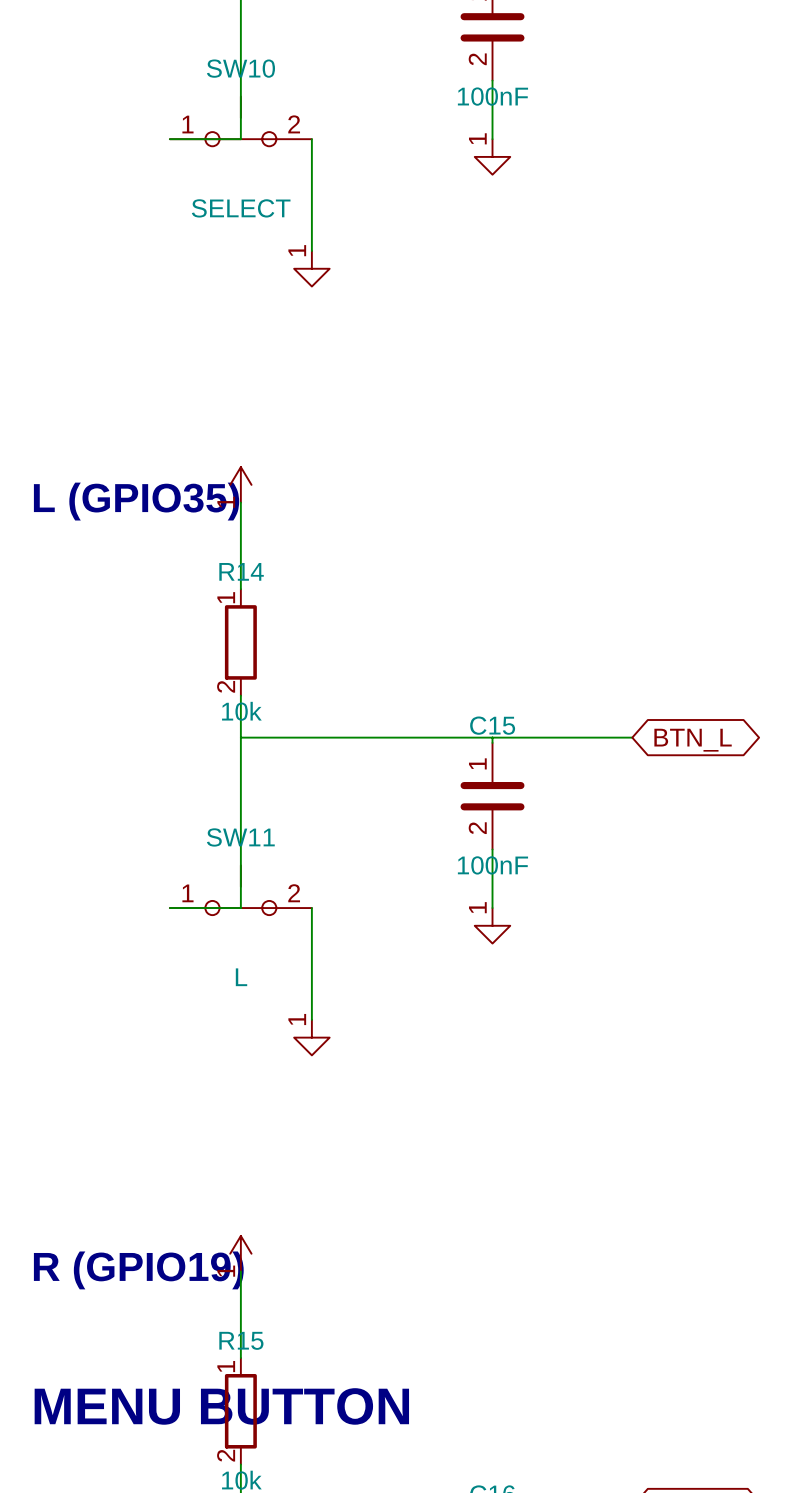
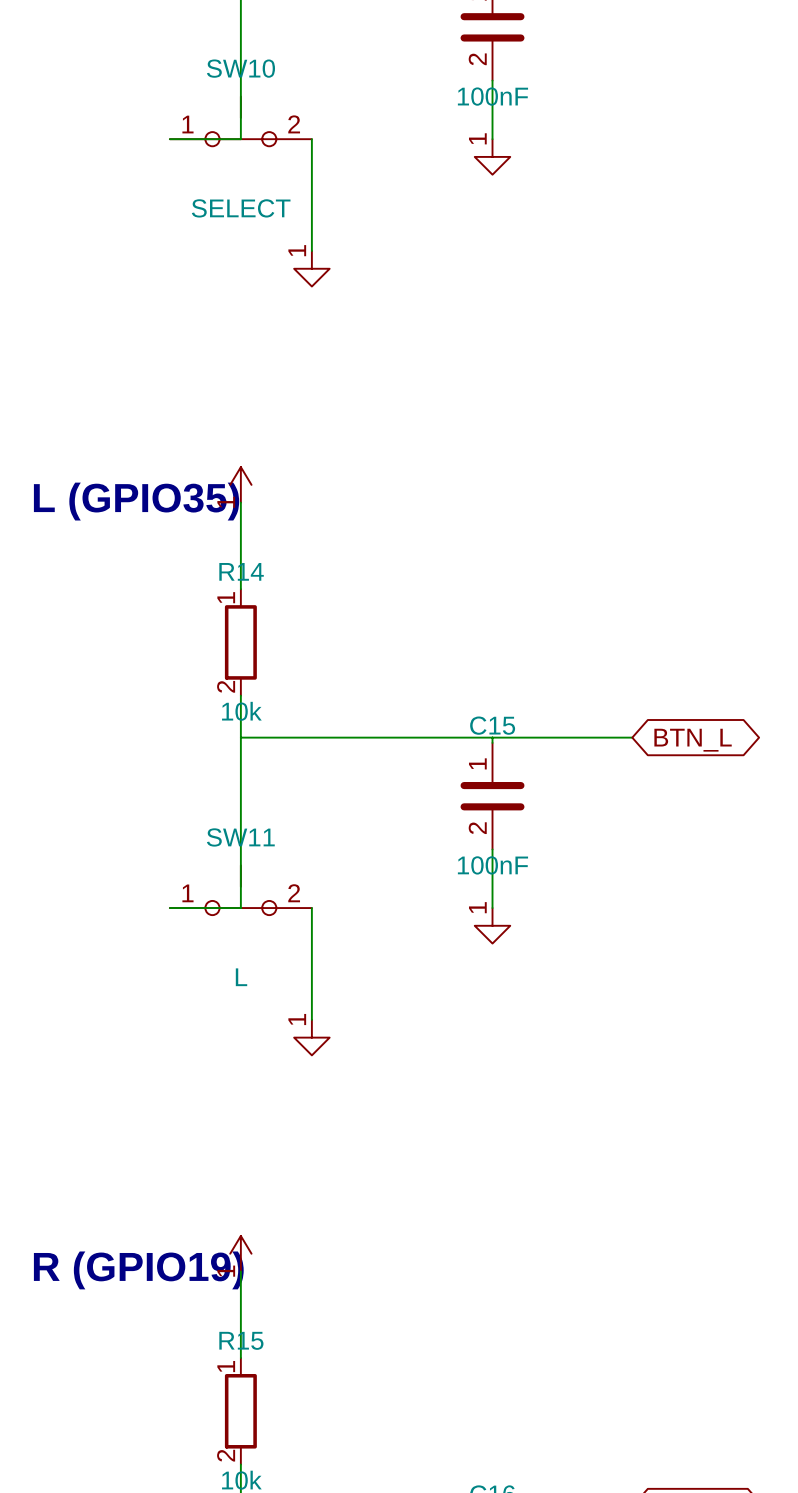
text: MENU BUTTON (221, 1406) -> none

